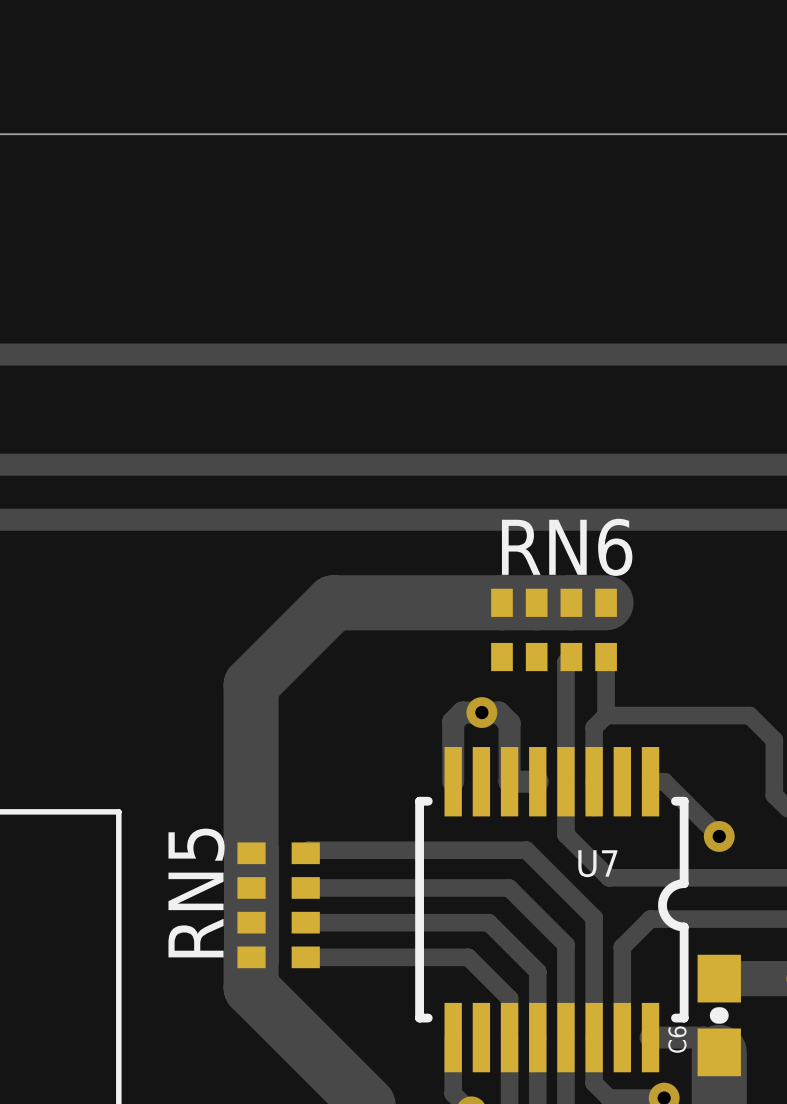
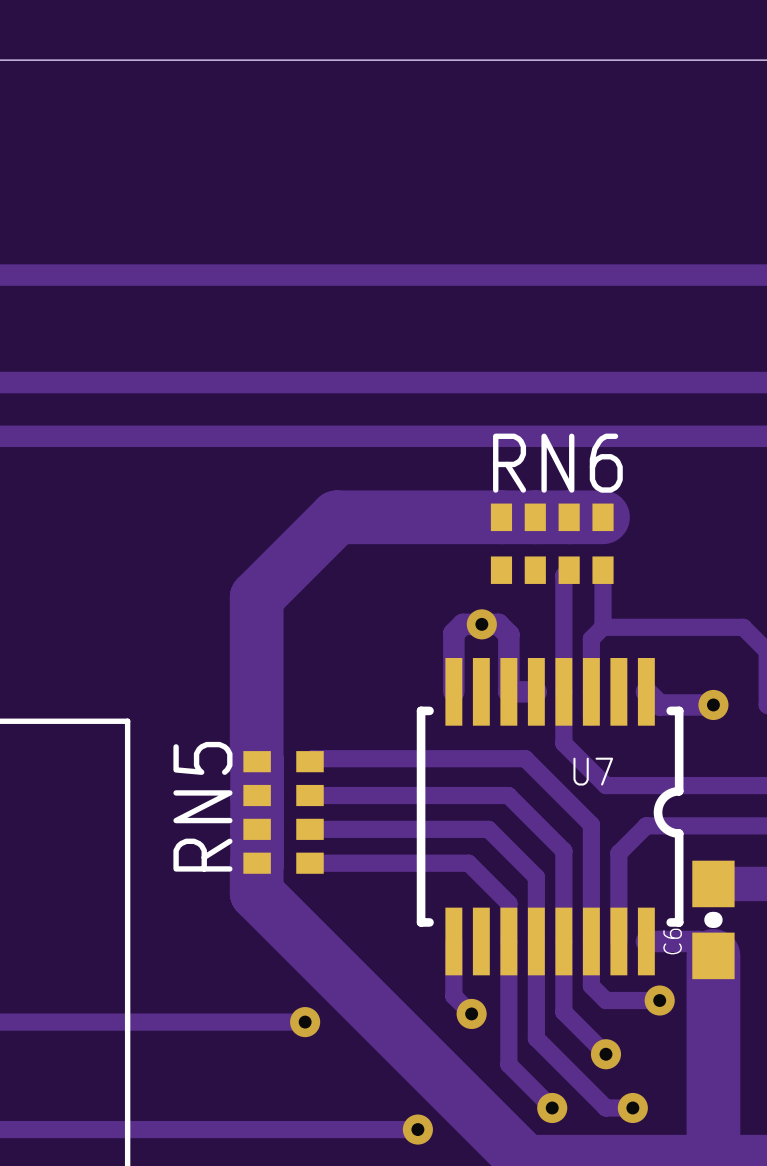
track: (650, 781) (664, 781) (719, 836) -> (646, 691) (659, 704) (713, 704)
via position: (719, 836) -> (713, 704)

